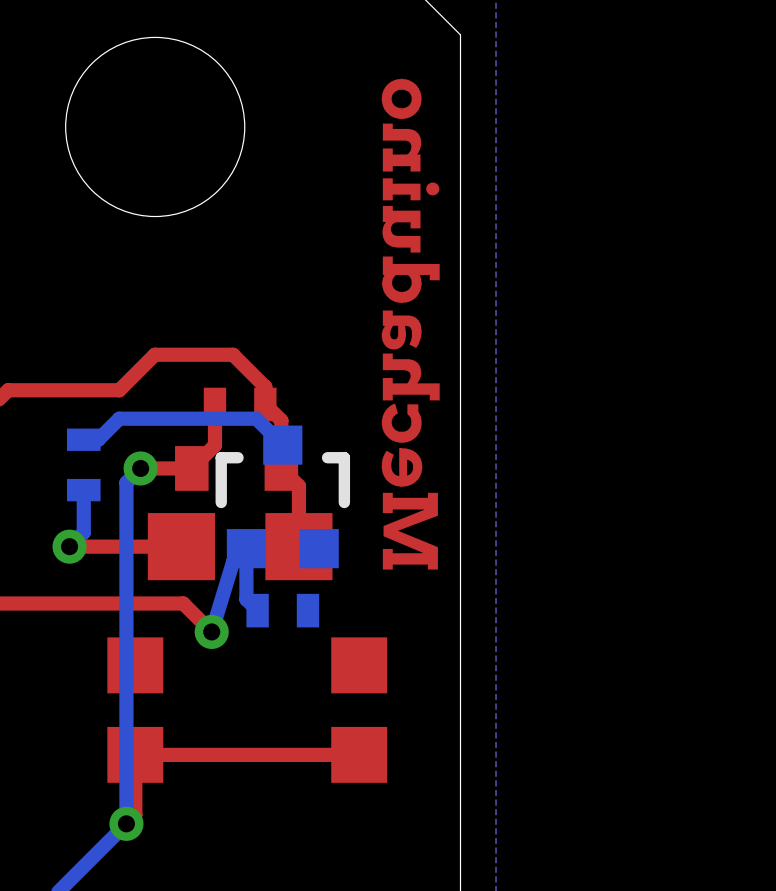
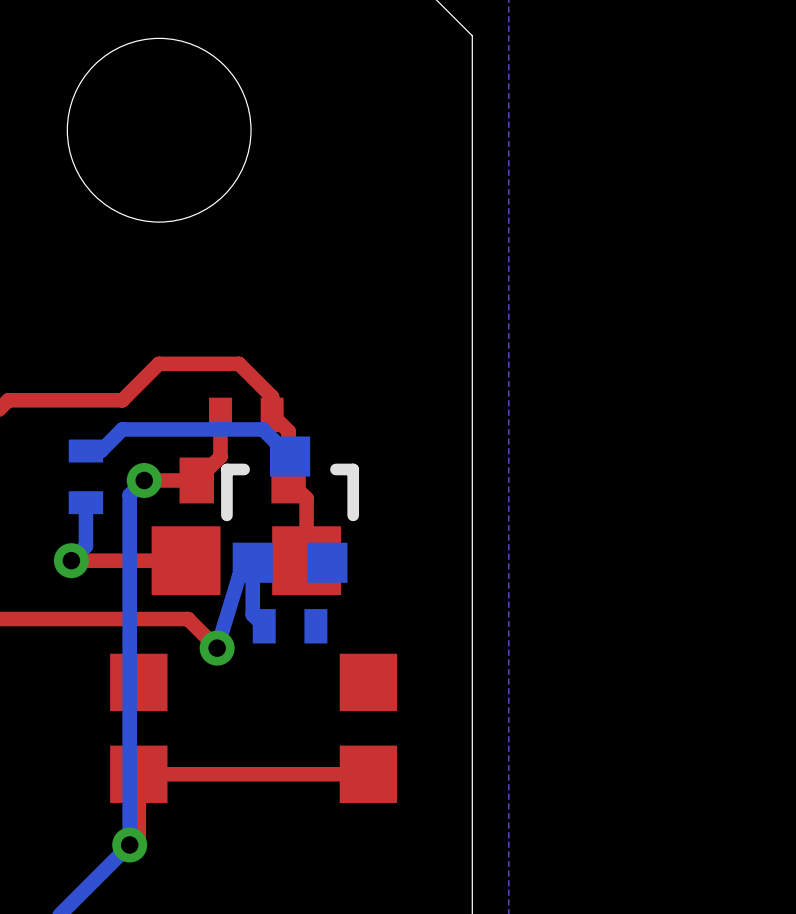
drawing: [381, 78, 440, 570] -> none

